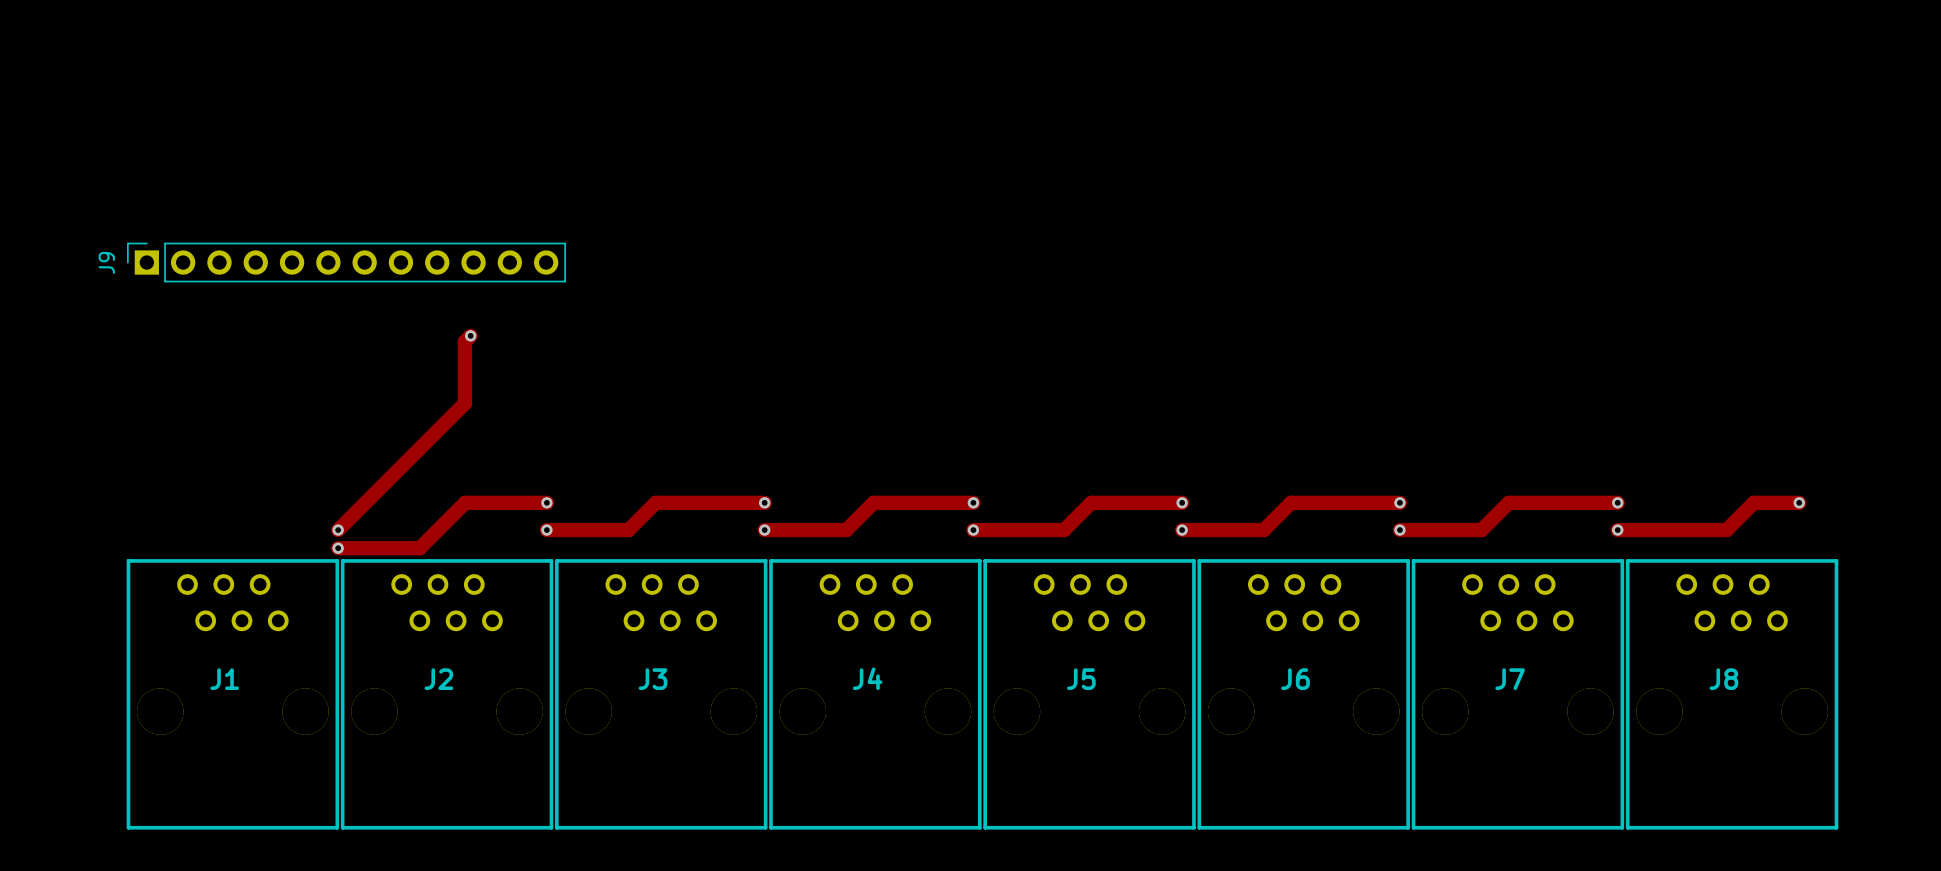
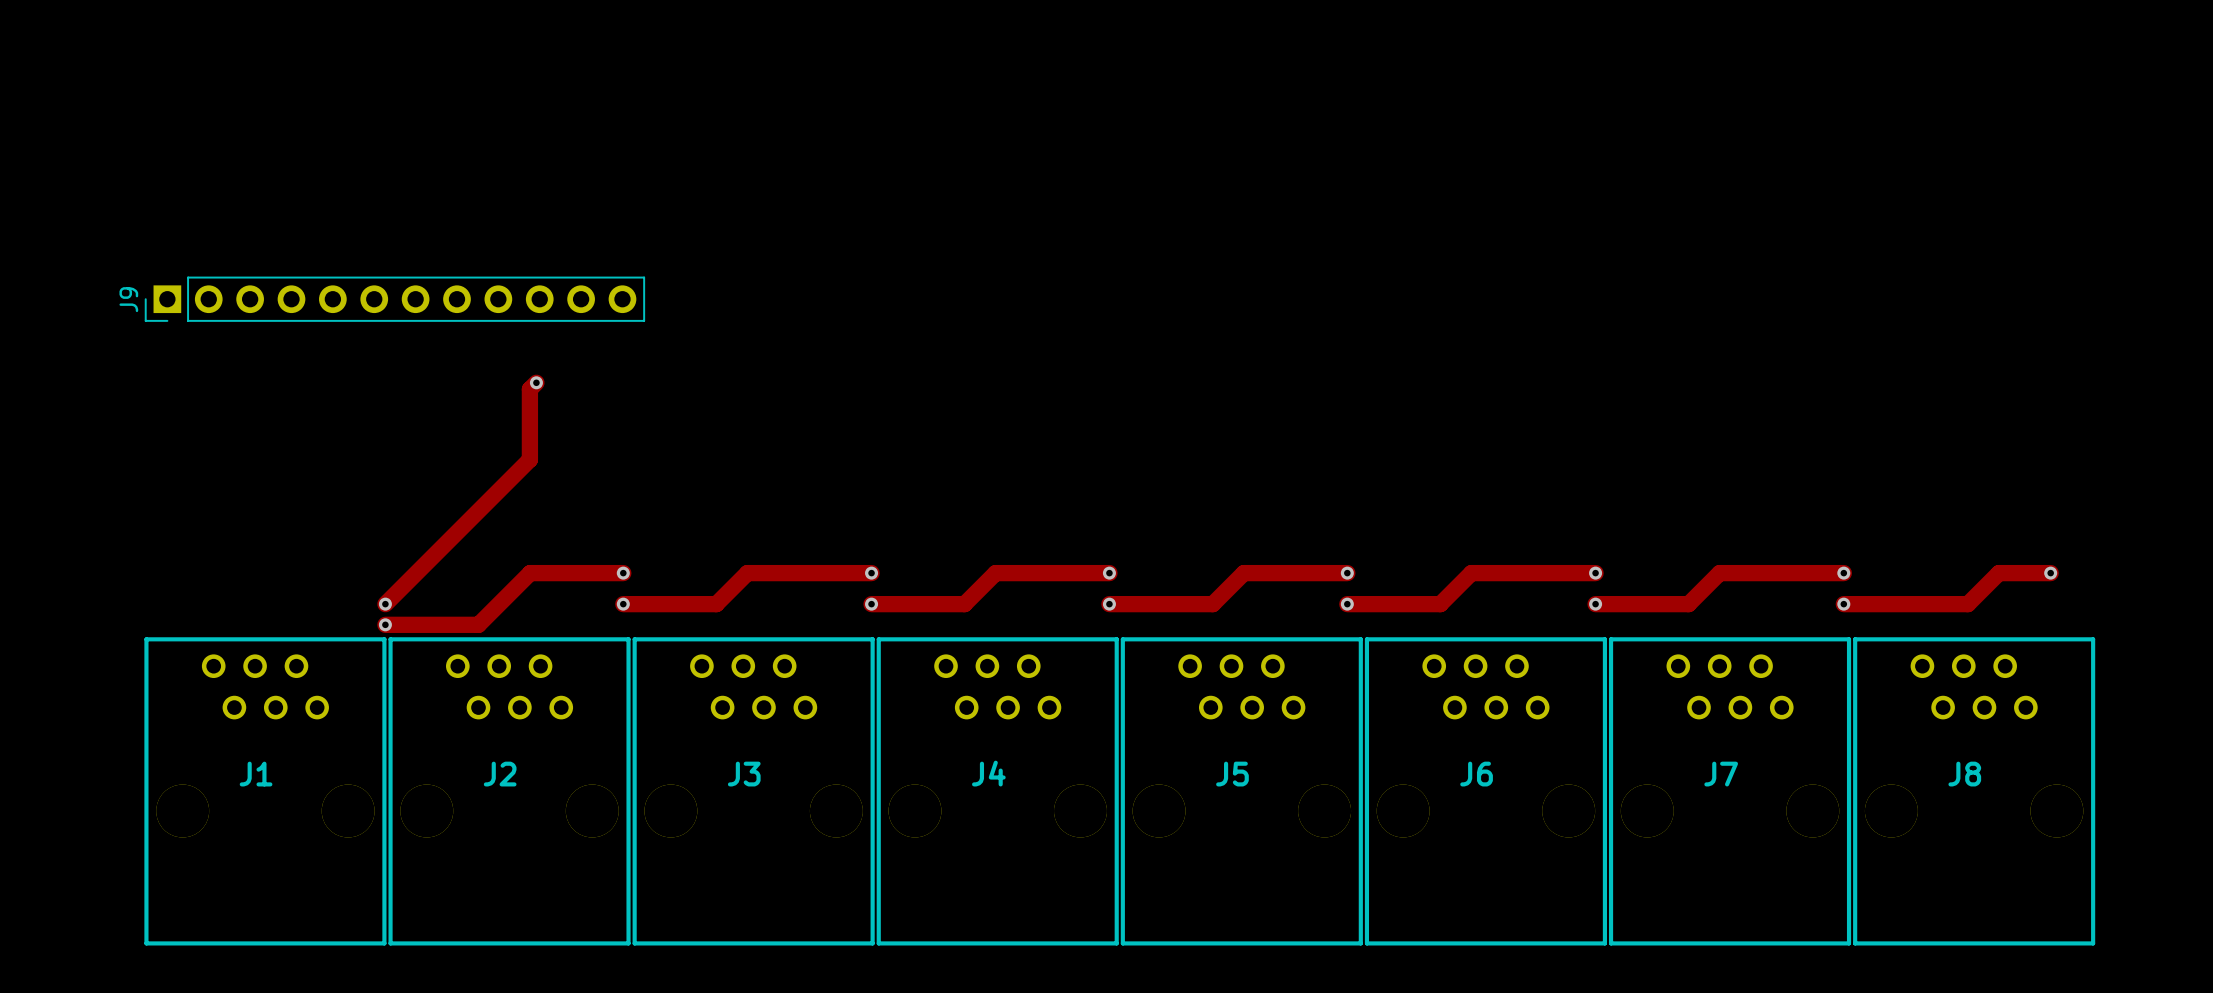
J9 footprint: [126, 242, 567, 283] -> [144, 276, 646, 322]

